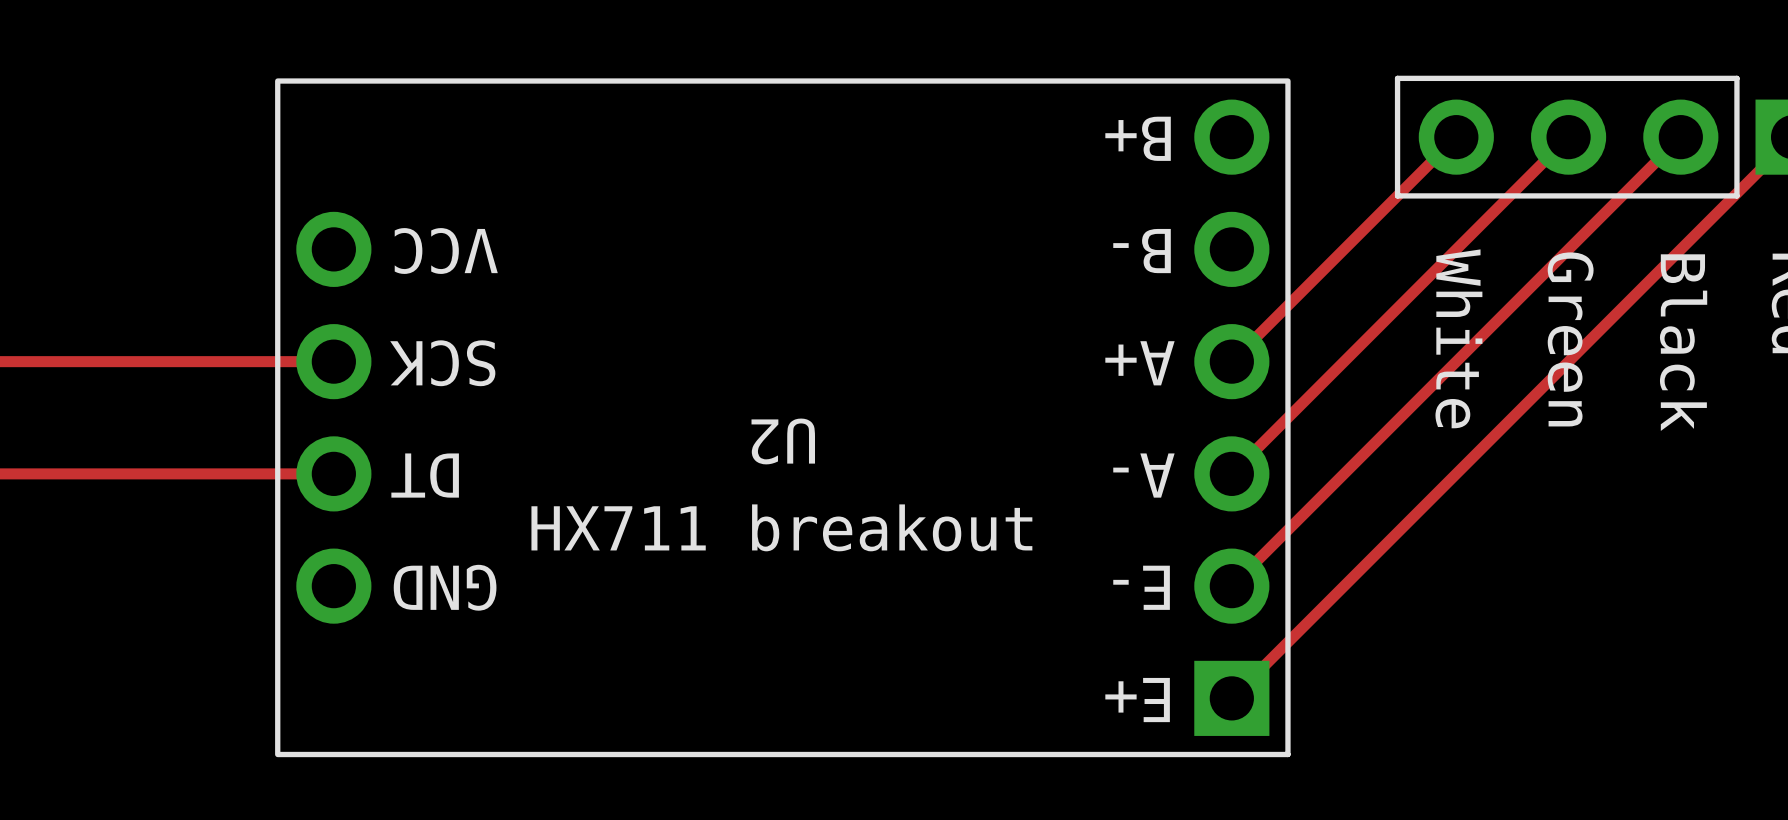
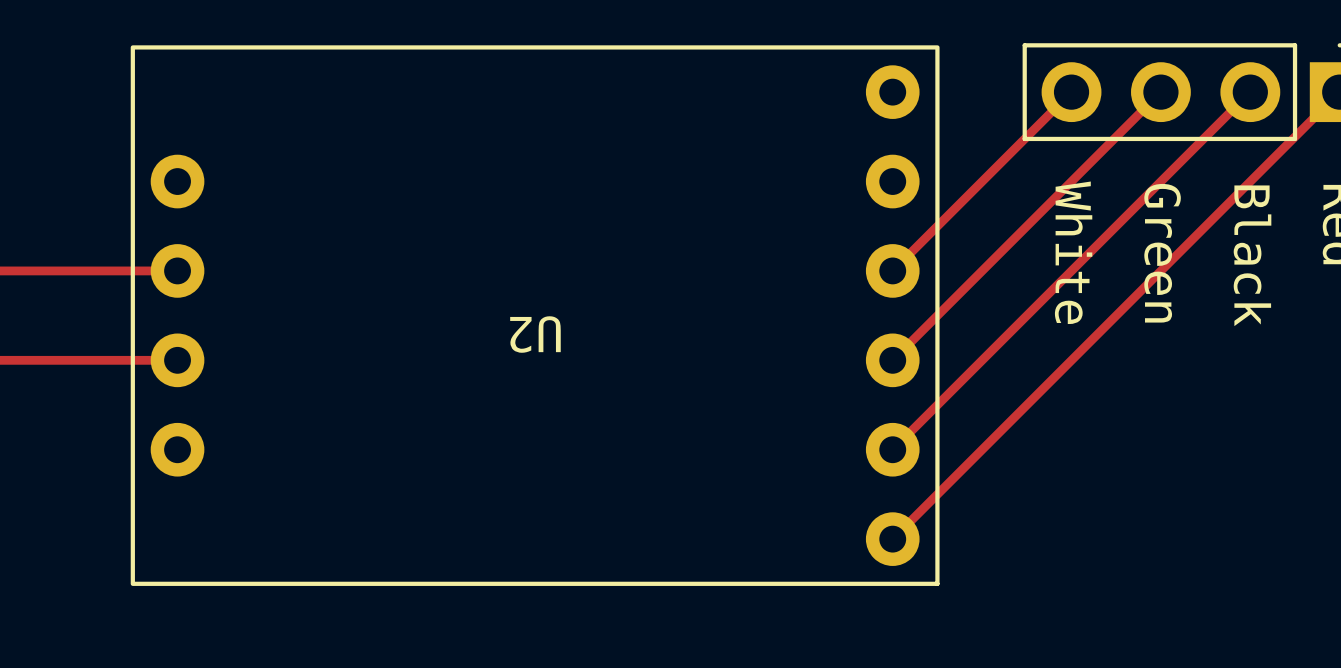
U2 footprint: [275, 78, 1291, 758] -> [130, 45, 940, 586]
text: HX711 breakout (781, 527) -> none

